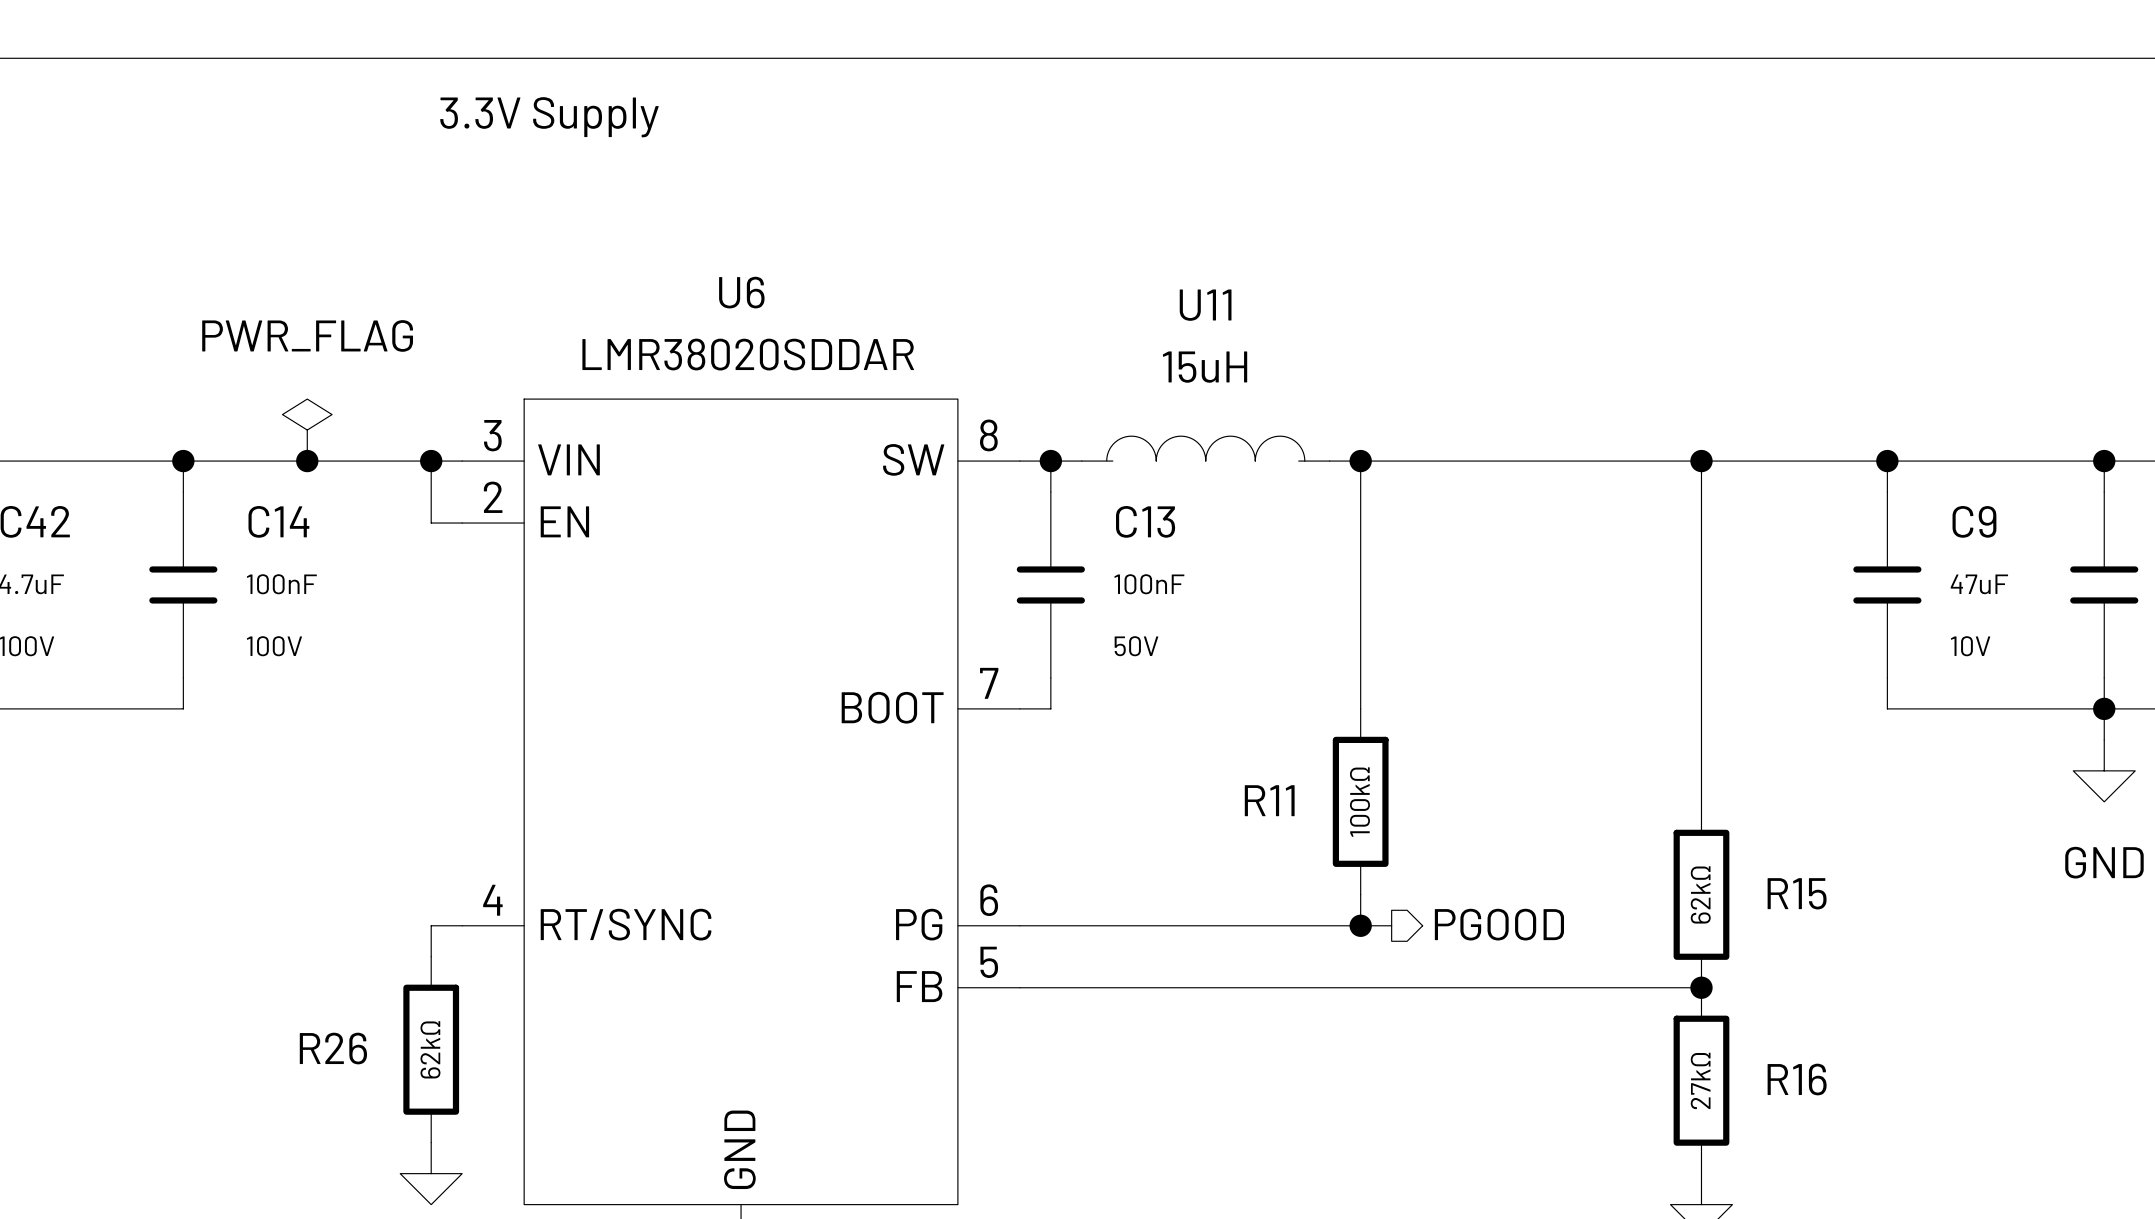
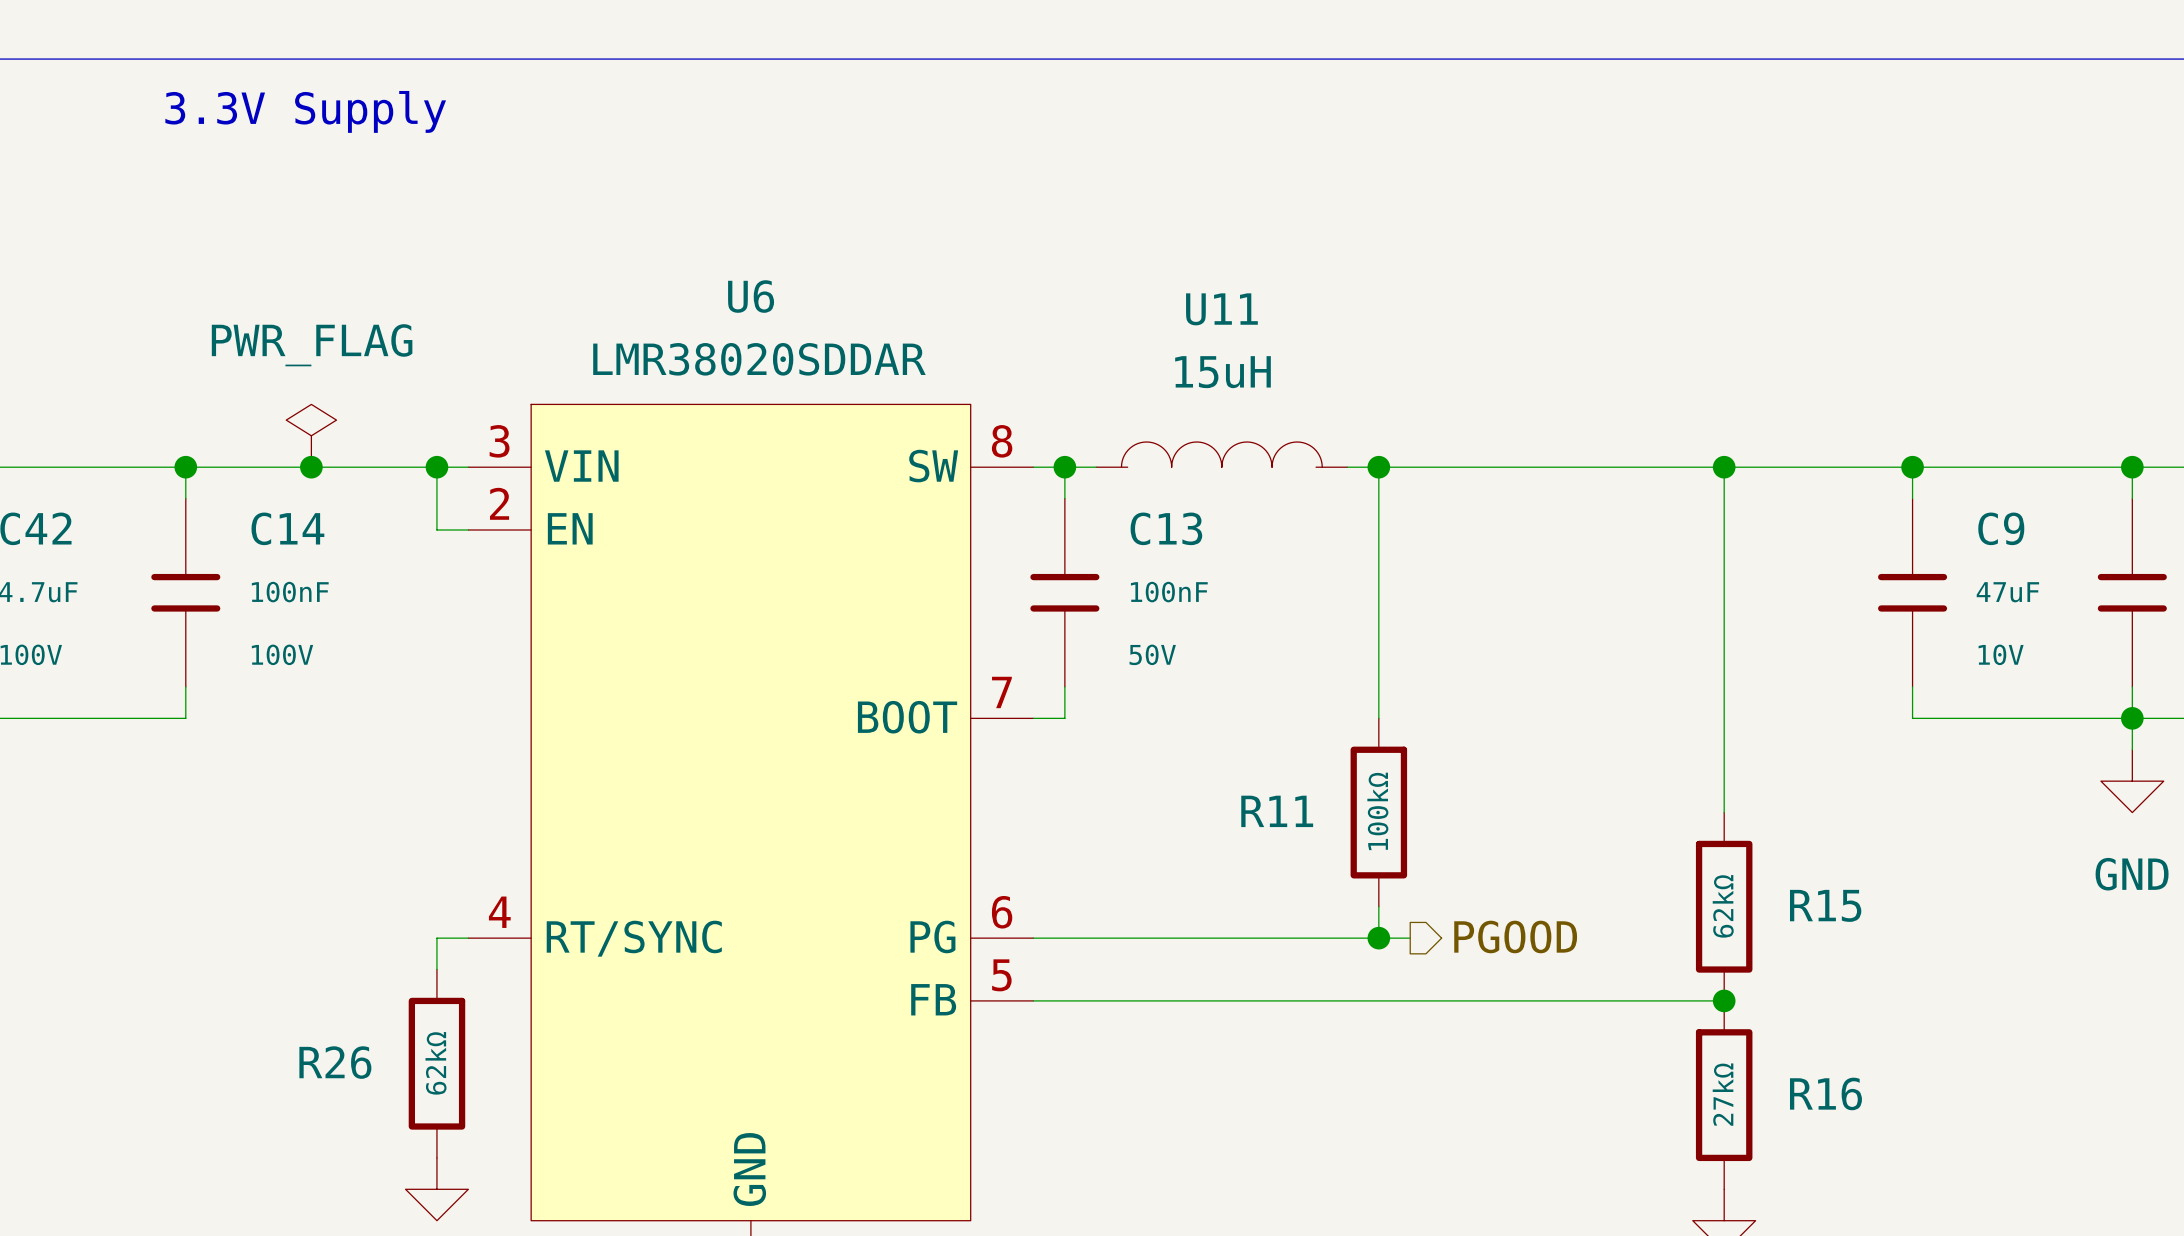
text position: 3.3V Supply (549, 117) -> 3.3V Supply (305, 111)

